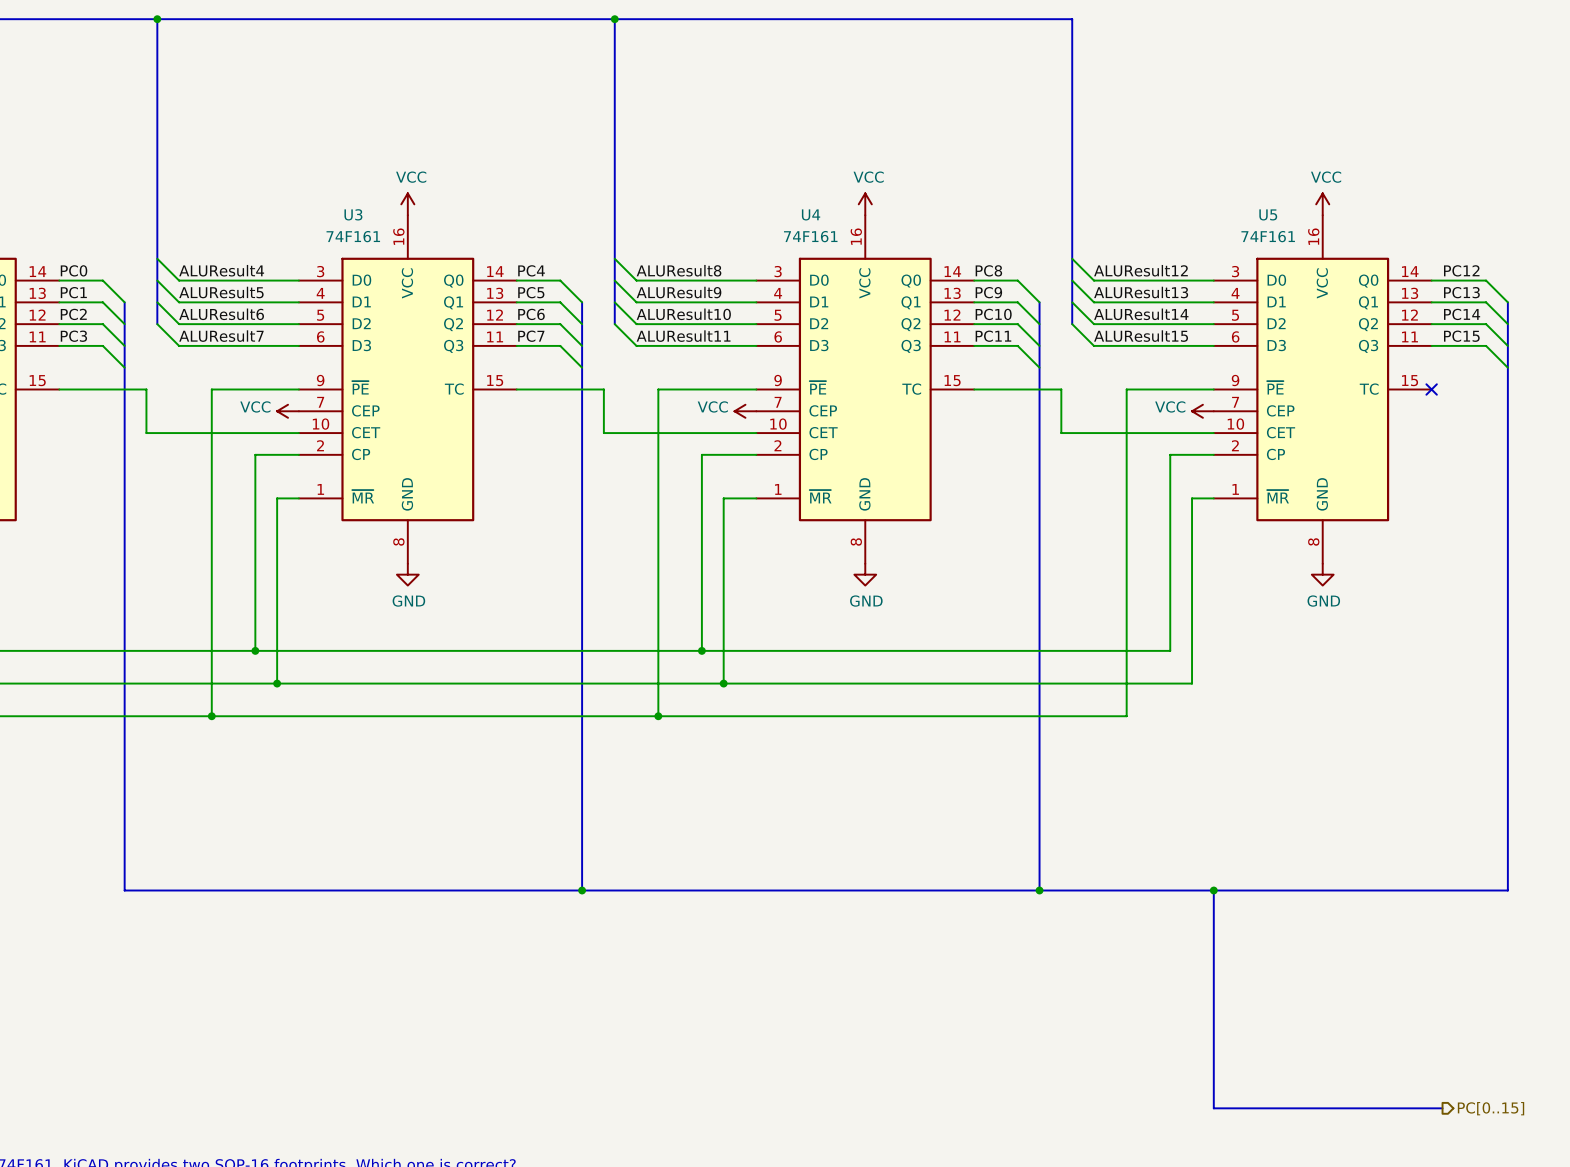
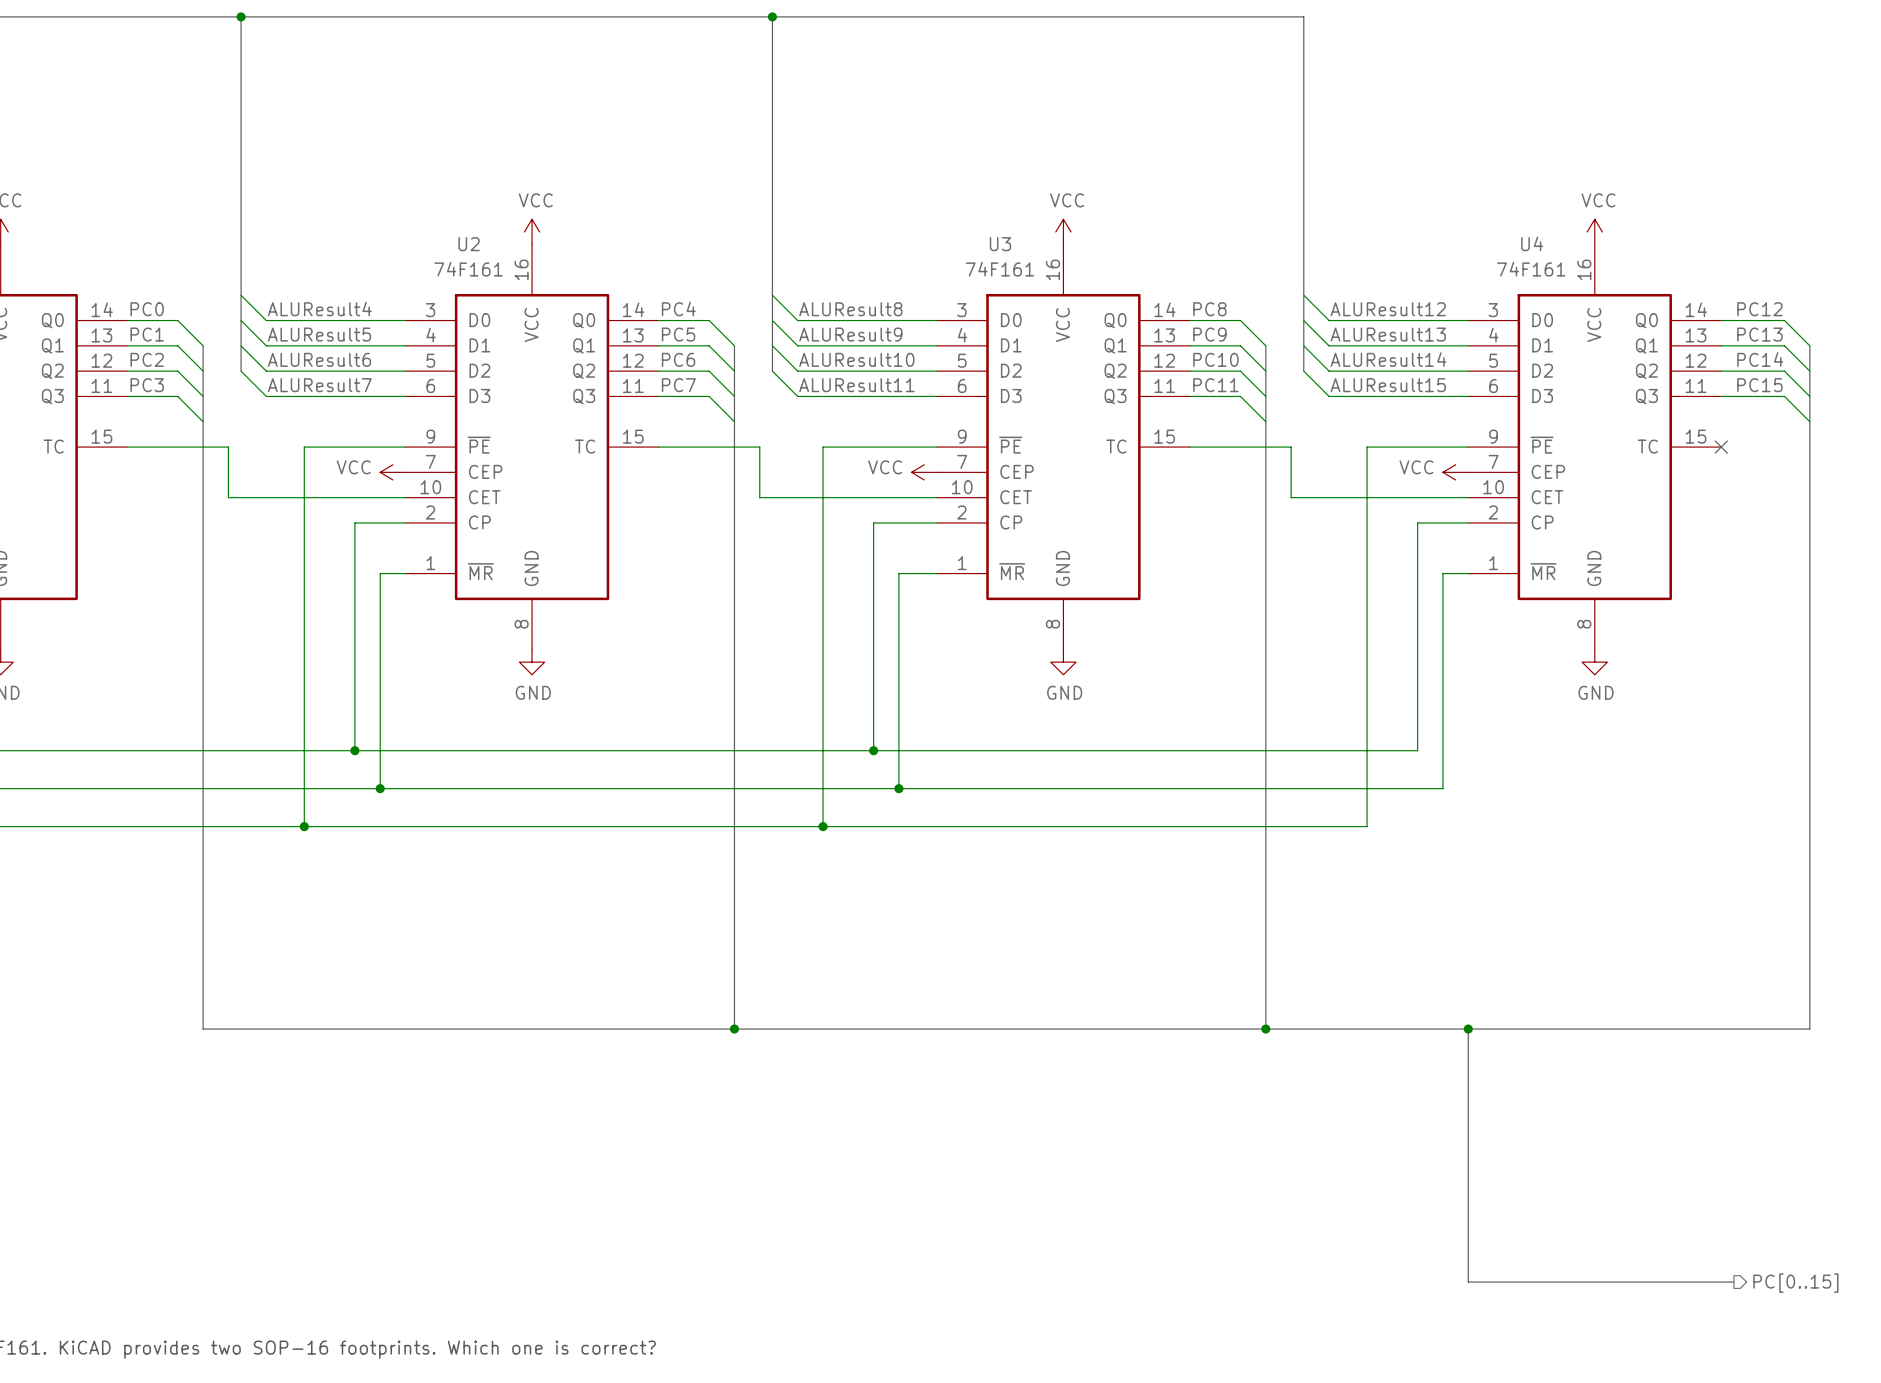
U3 name: U3 (353, 214) -> U2 (469, 244)
U4 name: U4 (811, 214) -> U3 (1000, 244)
U5 name: U5 (1268, 214) -> U4 (1532, 243)

